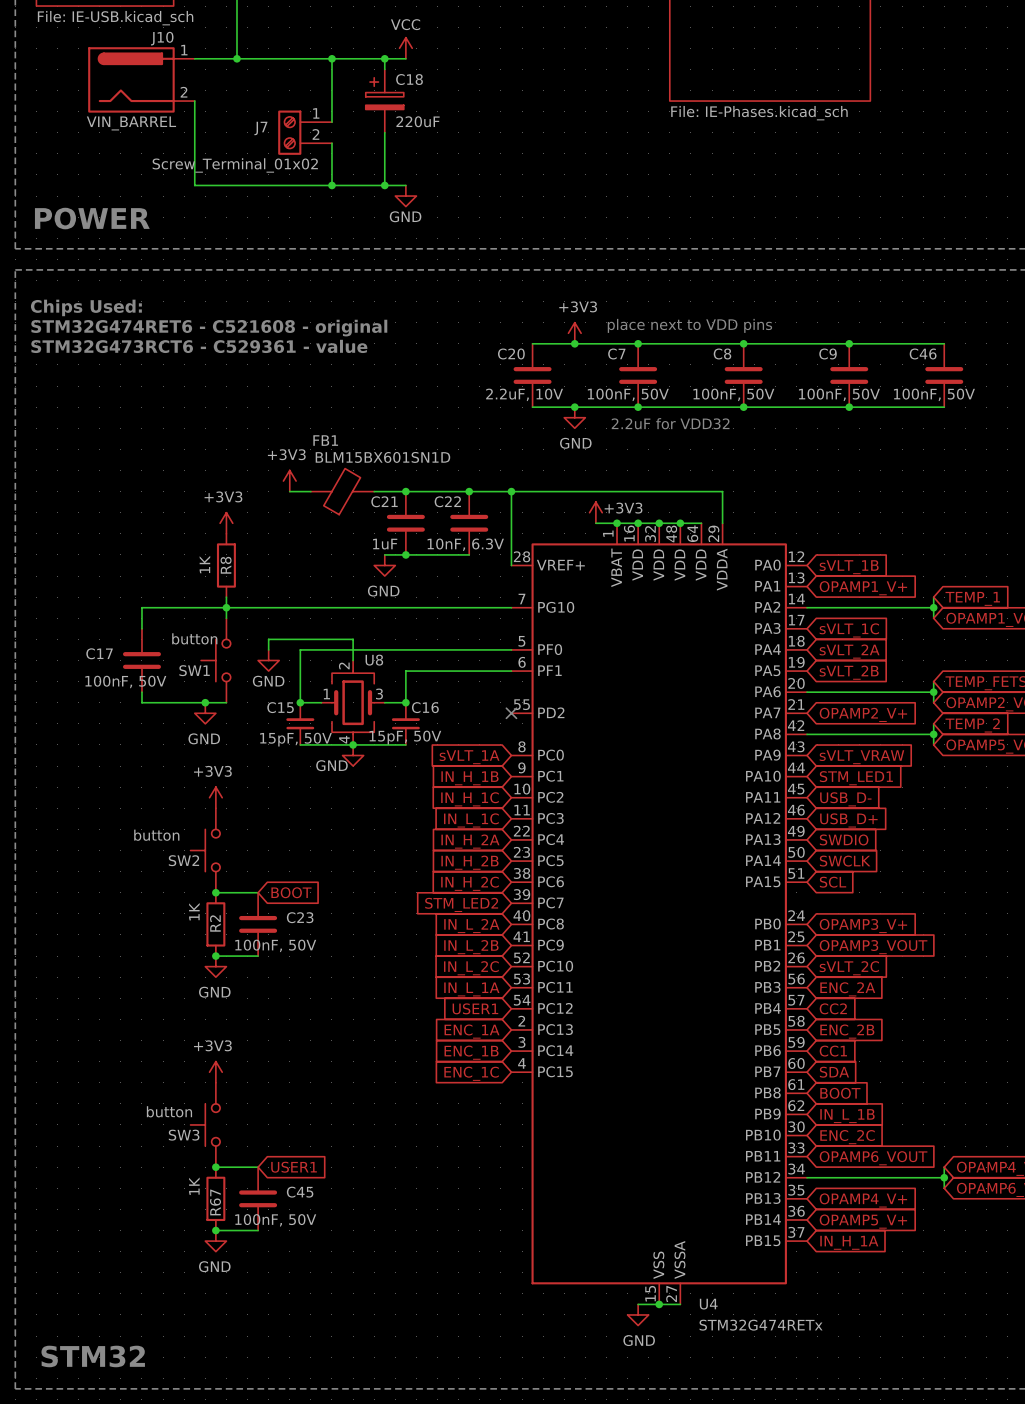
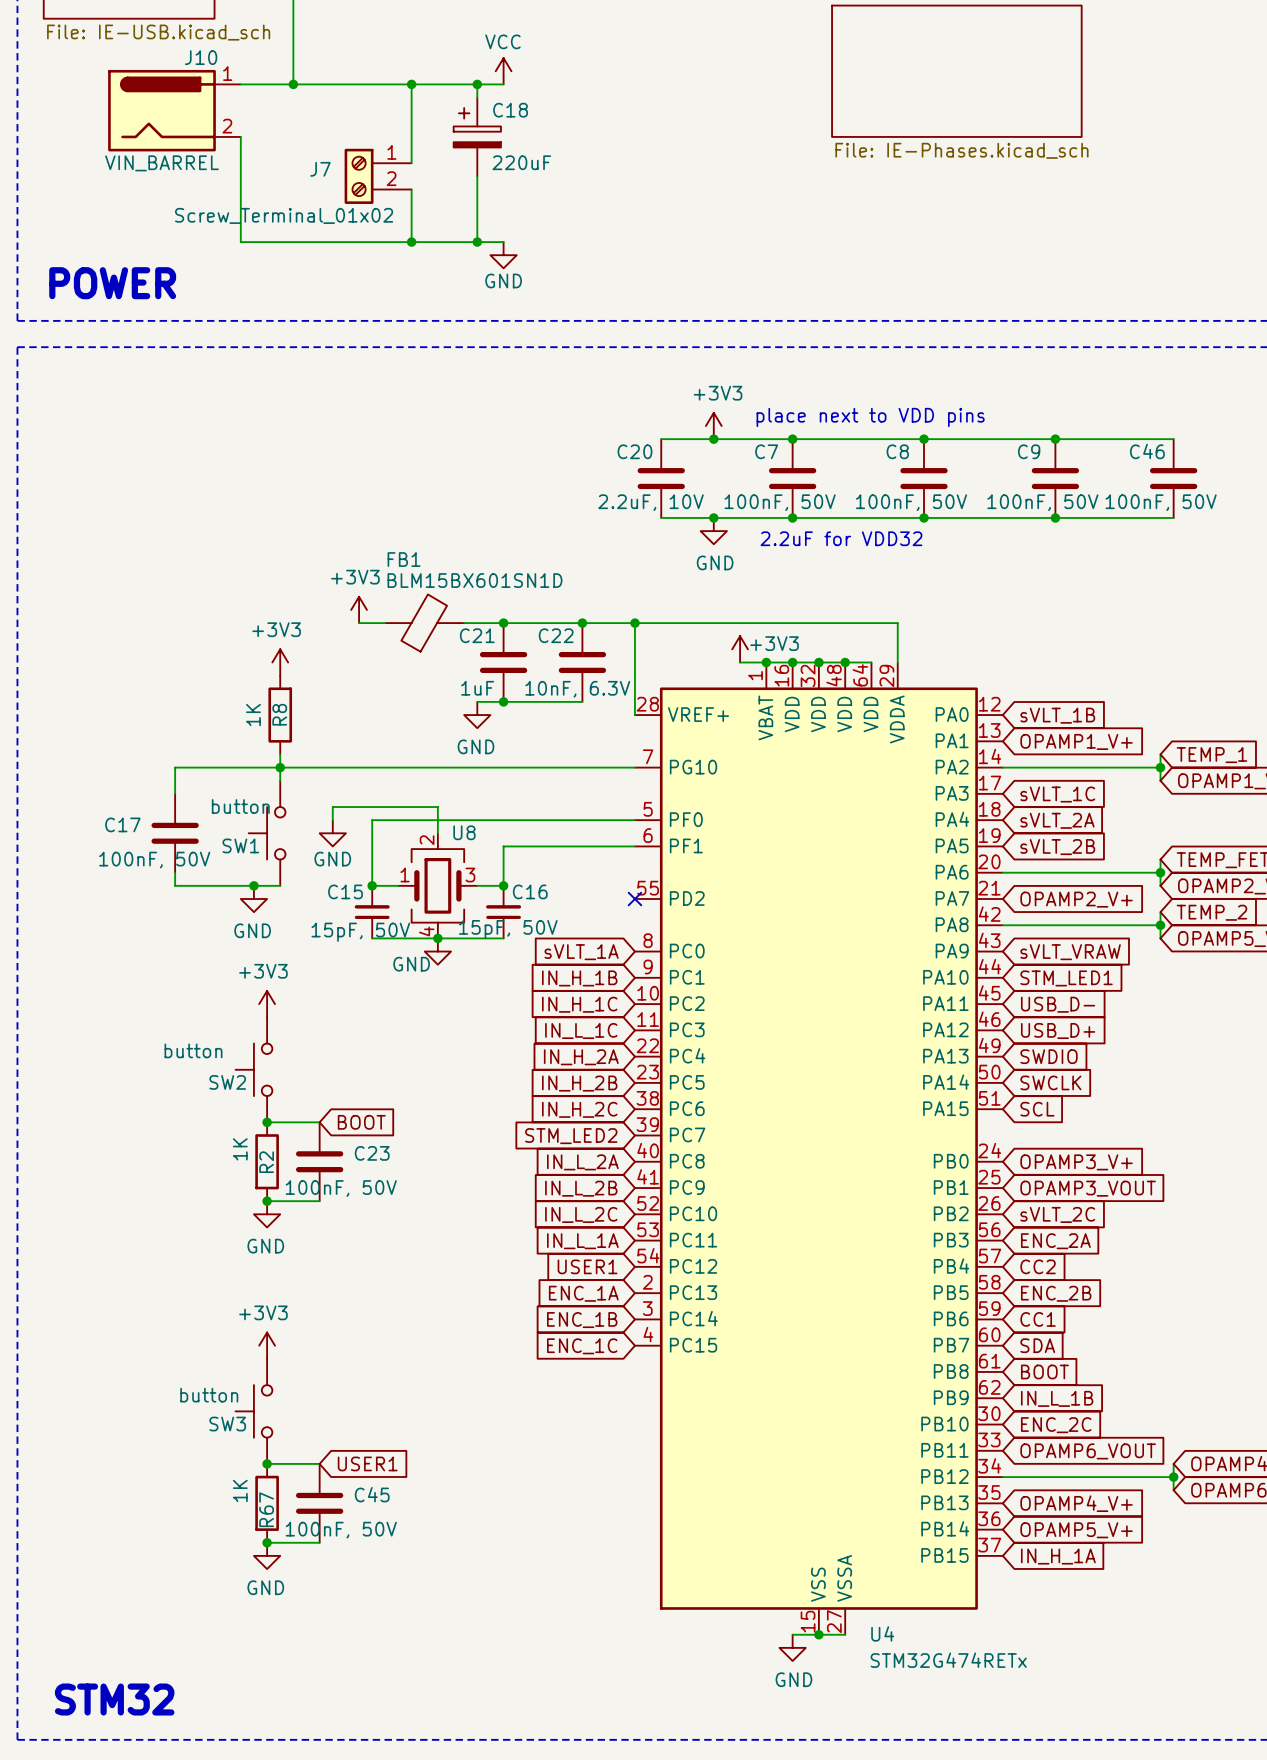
text: Chips Used: (86, 307) -> none
text: STM32G474RET6 - C521608 - original (209, 328) -> none
text: STM32G473RCT6 - C529361 - value (199, 346) -> none

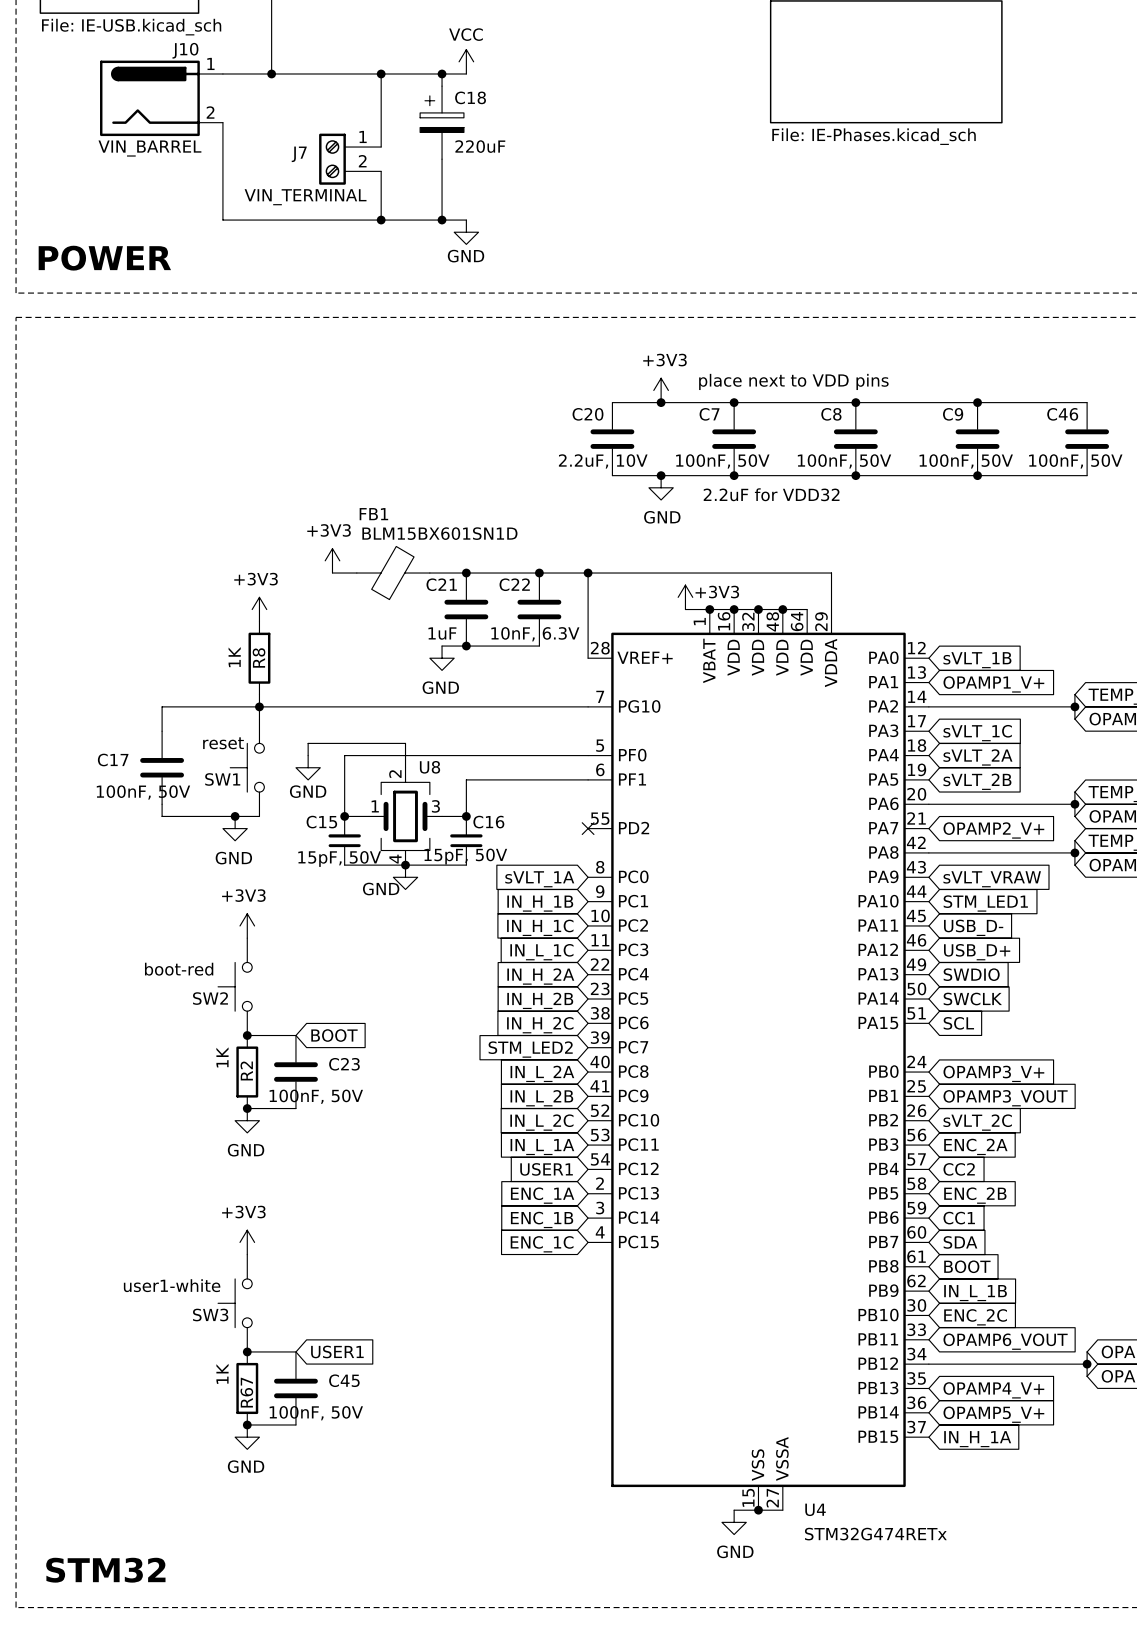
J7 value: Screw_Terminal_01x02 (284, 215) -> VIN_TERMINAL (305, 197)
SW1 value: button (240, 806) -> reset (223, 743)
SW2 value: button (193, 1050) -> boot-red (179, 969)
SW3 value: button (209, 1395) -> user1-white (172, 1285)

